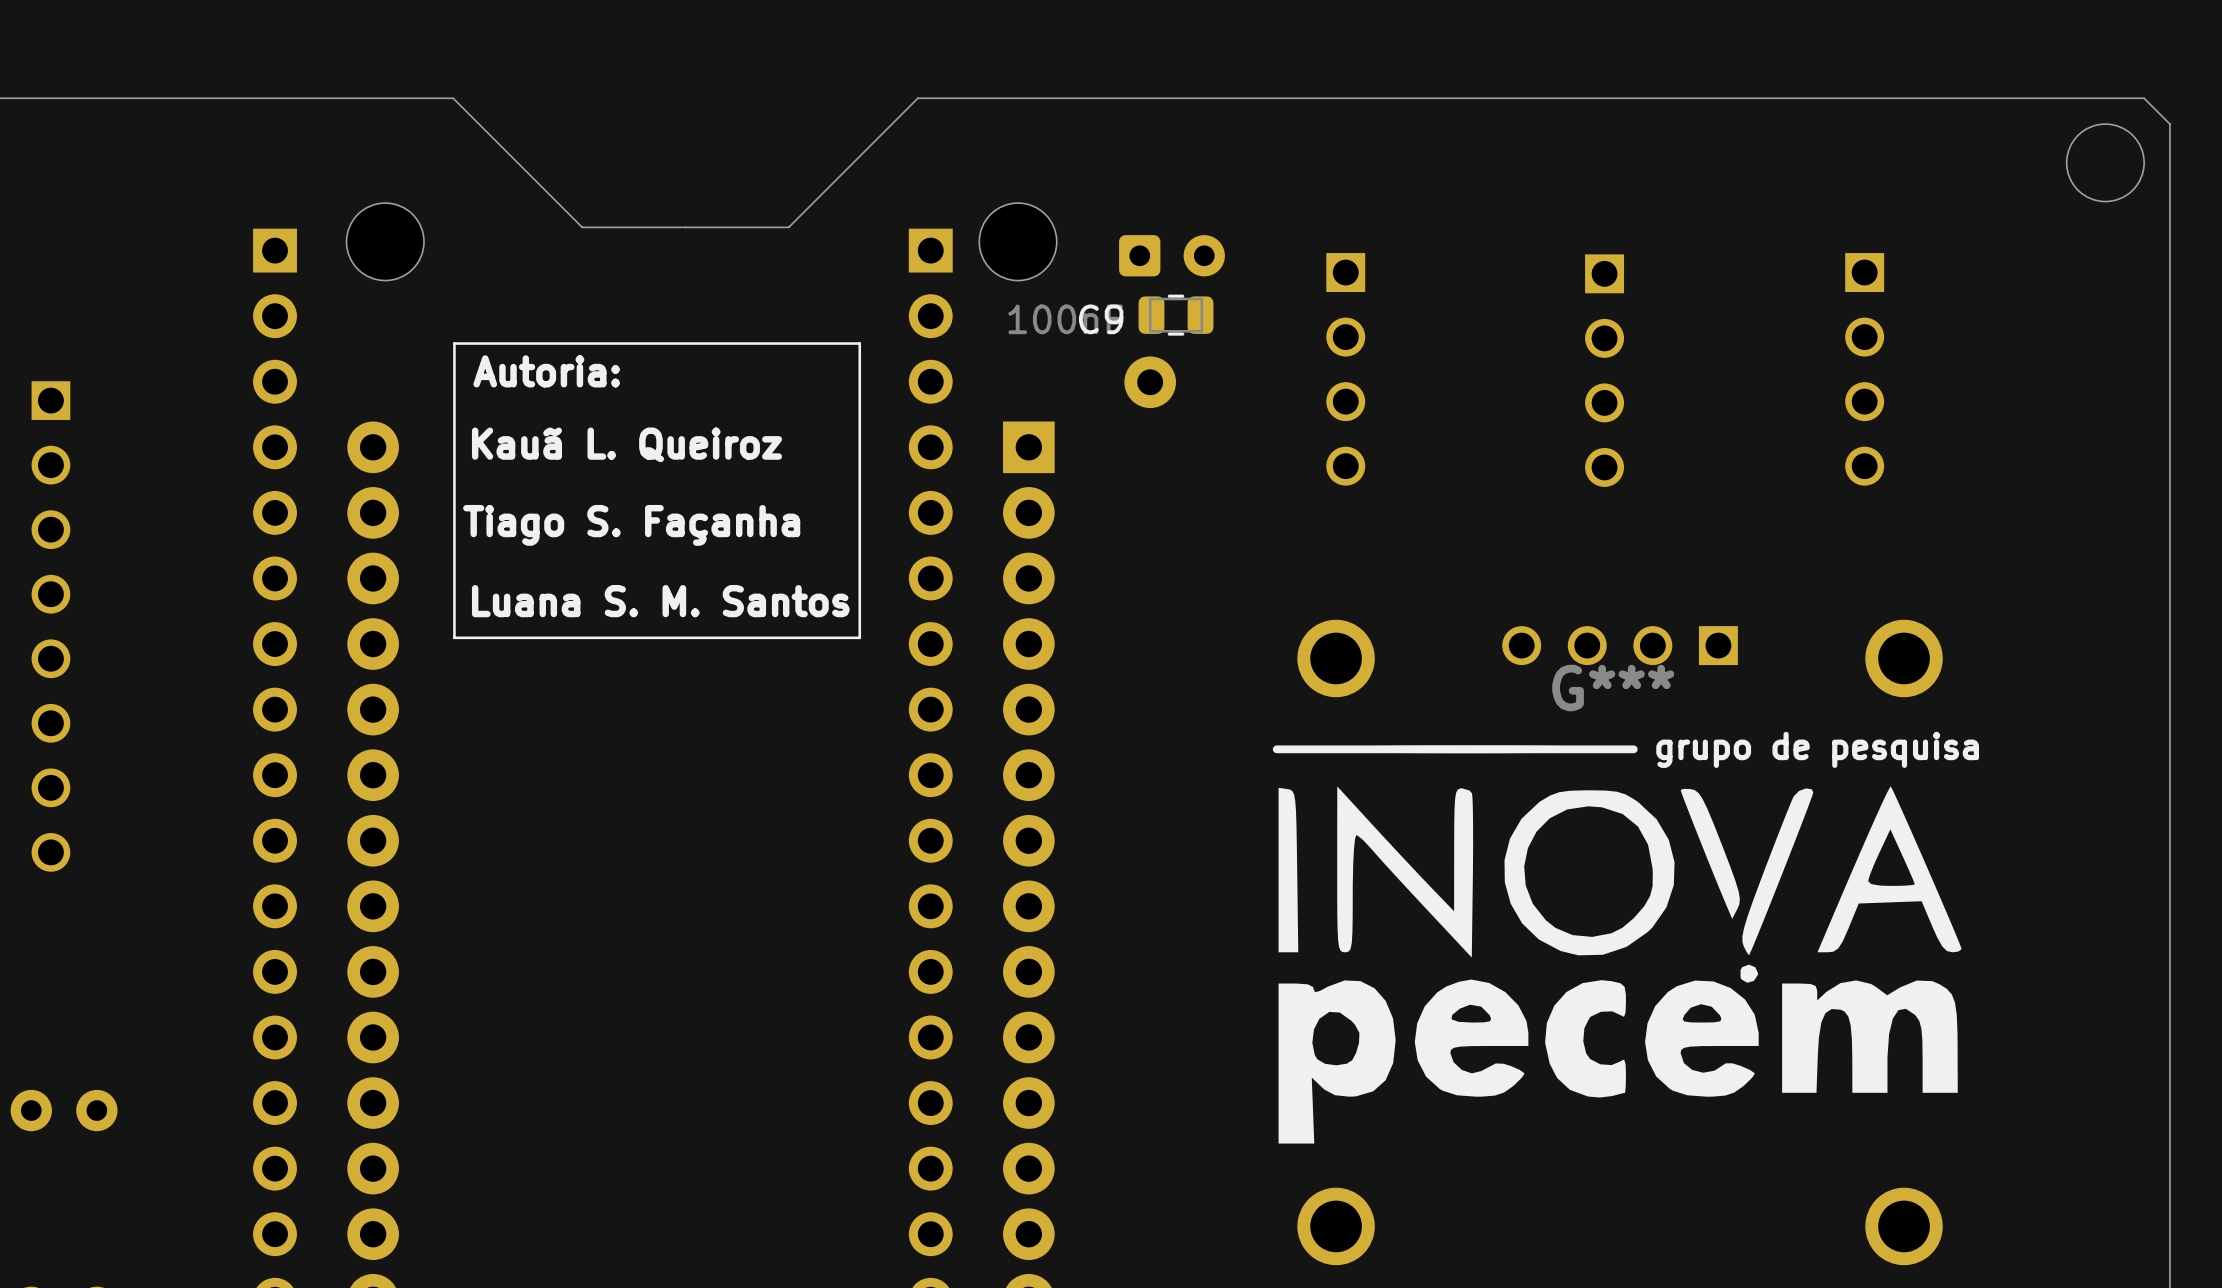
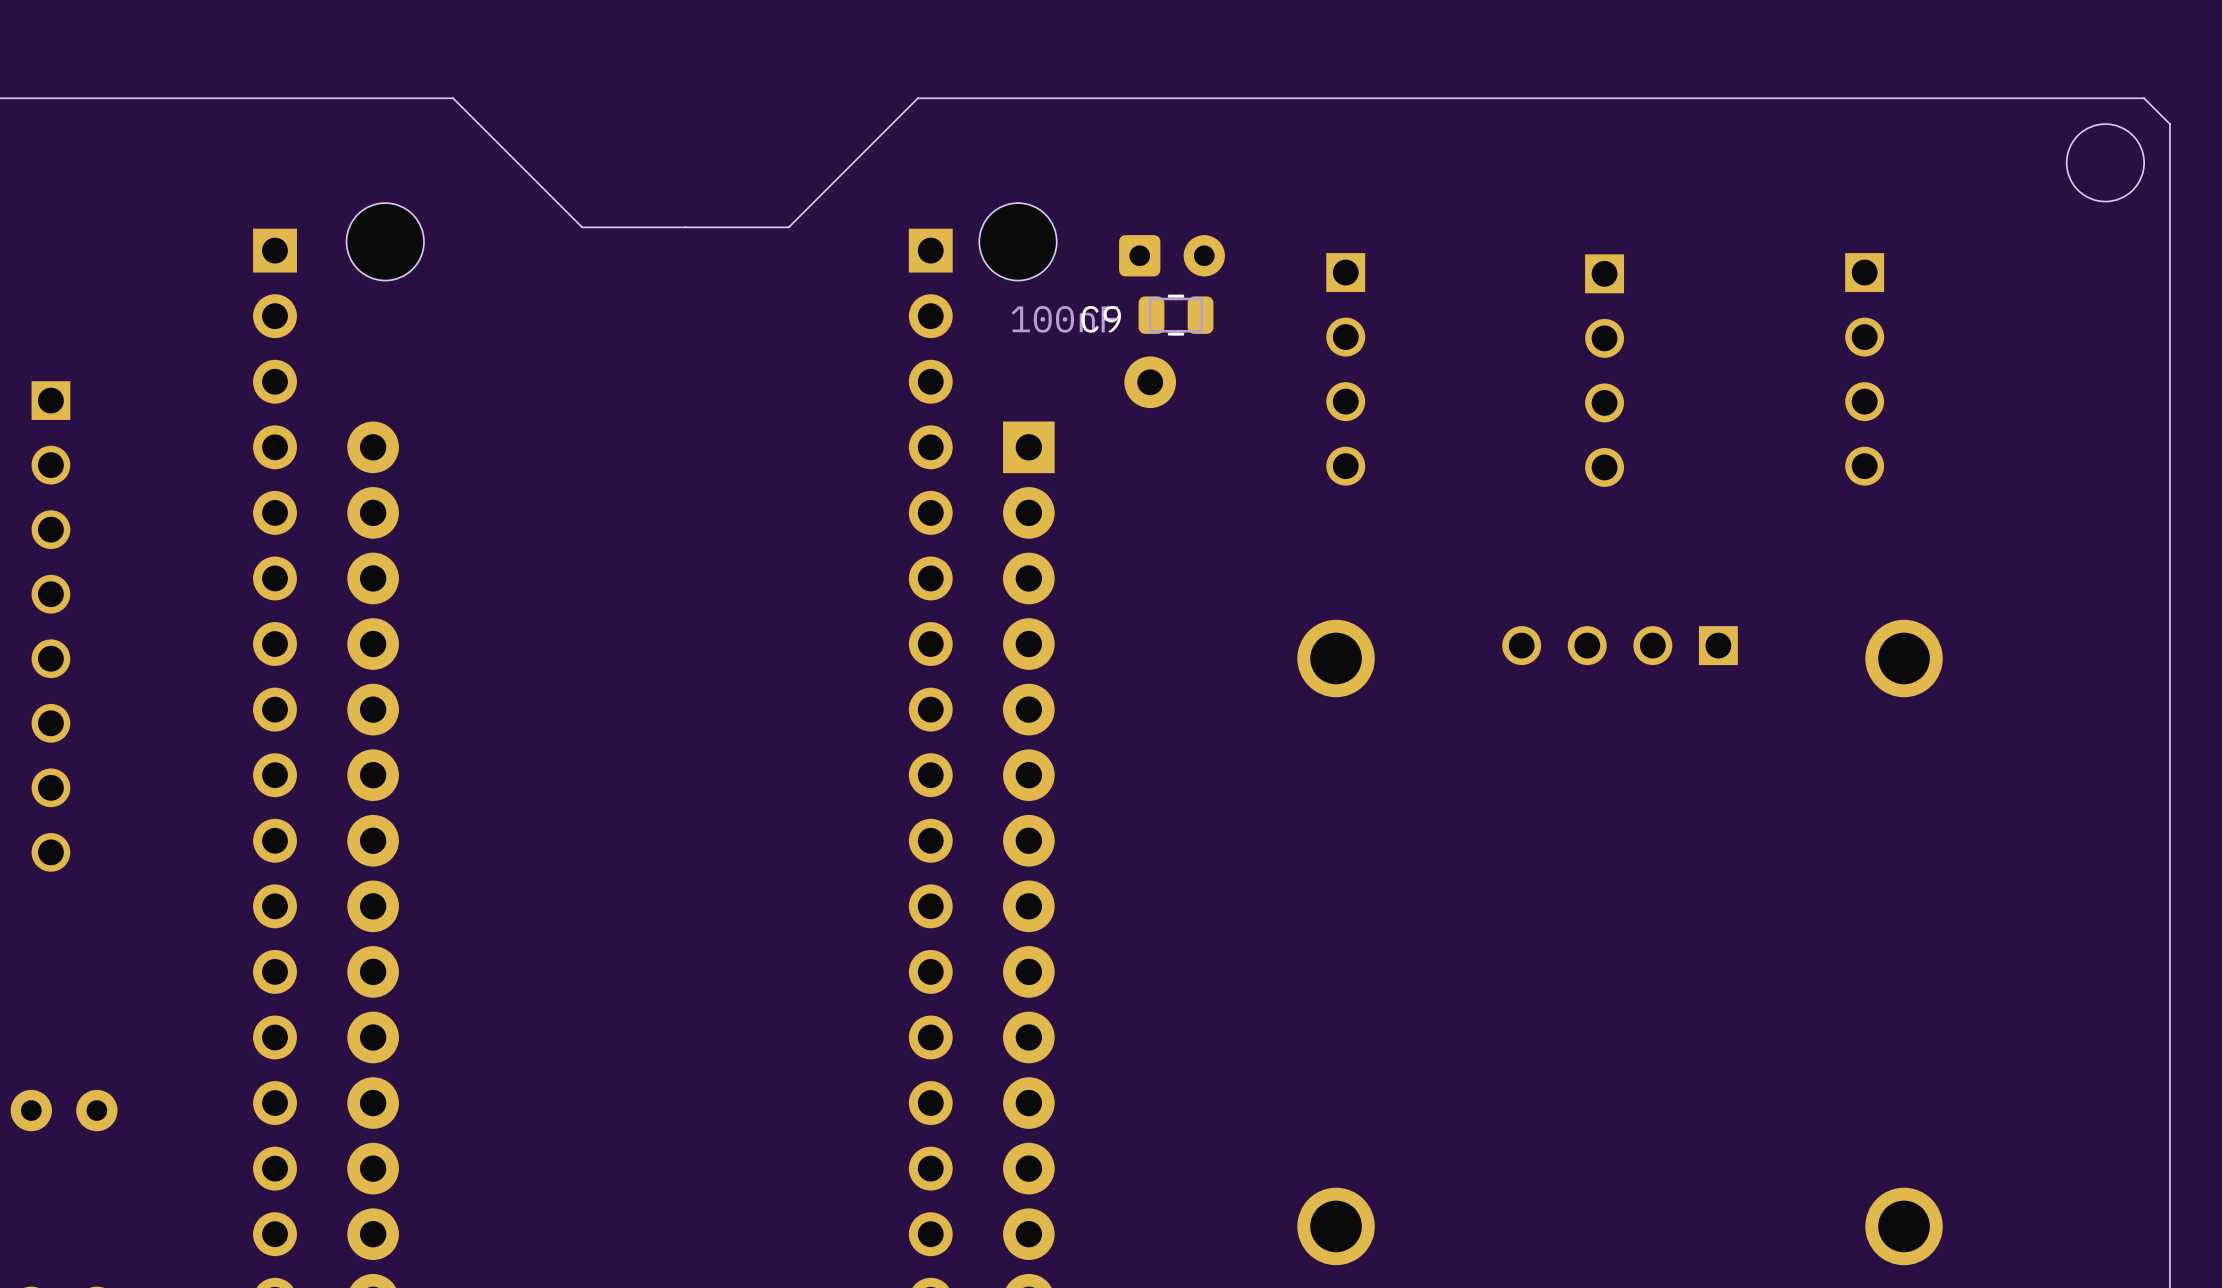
line: (859, 343) (454, 343) (454, 637) (859, 637) (859, 343) -> none
text: Autoria: (546, 371) -> none
text: Kauã L. Queiroz (626, 444) -> none
text: Tiago S. Façanha (631, 525) -> none
text: Luana S. M. Santos (660, 601) -> none
G***: (1617, 944) -> none

